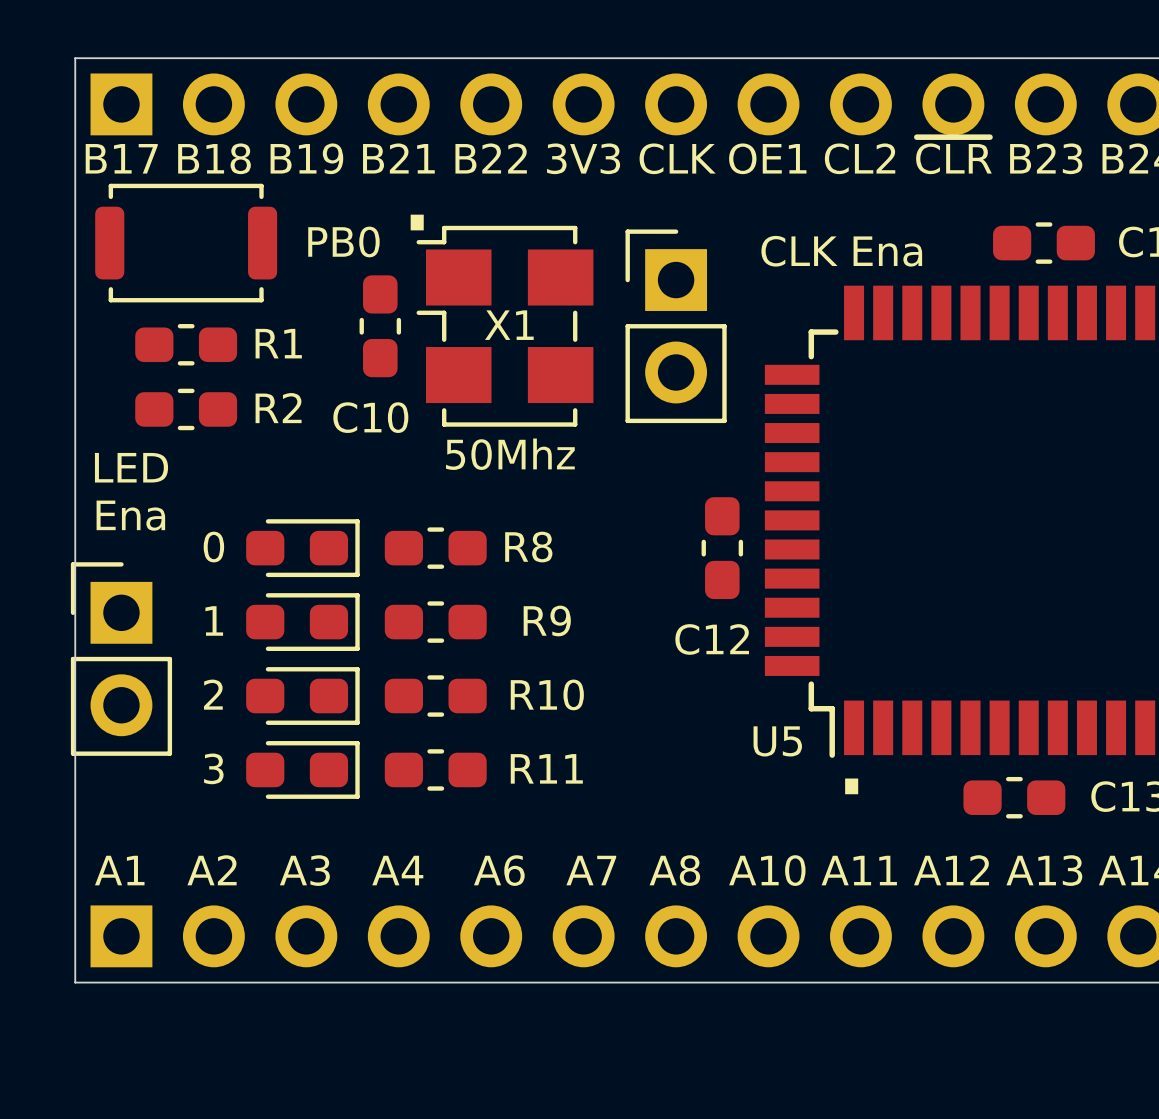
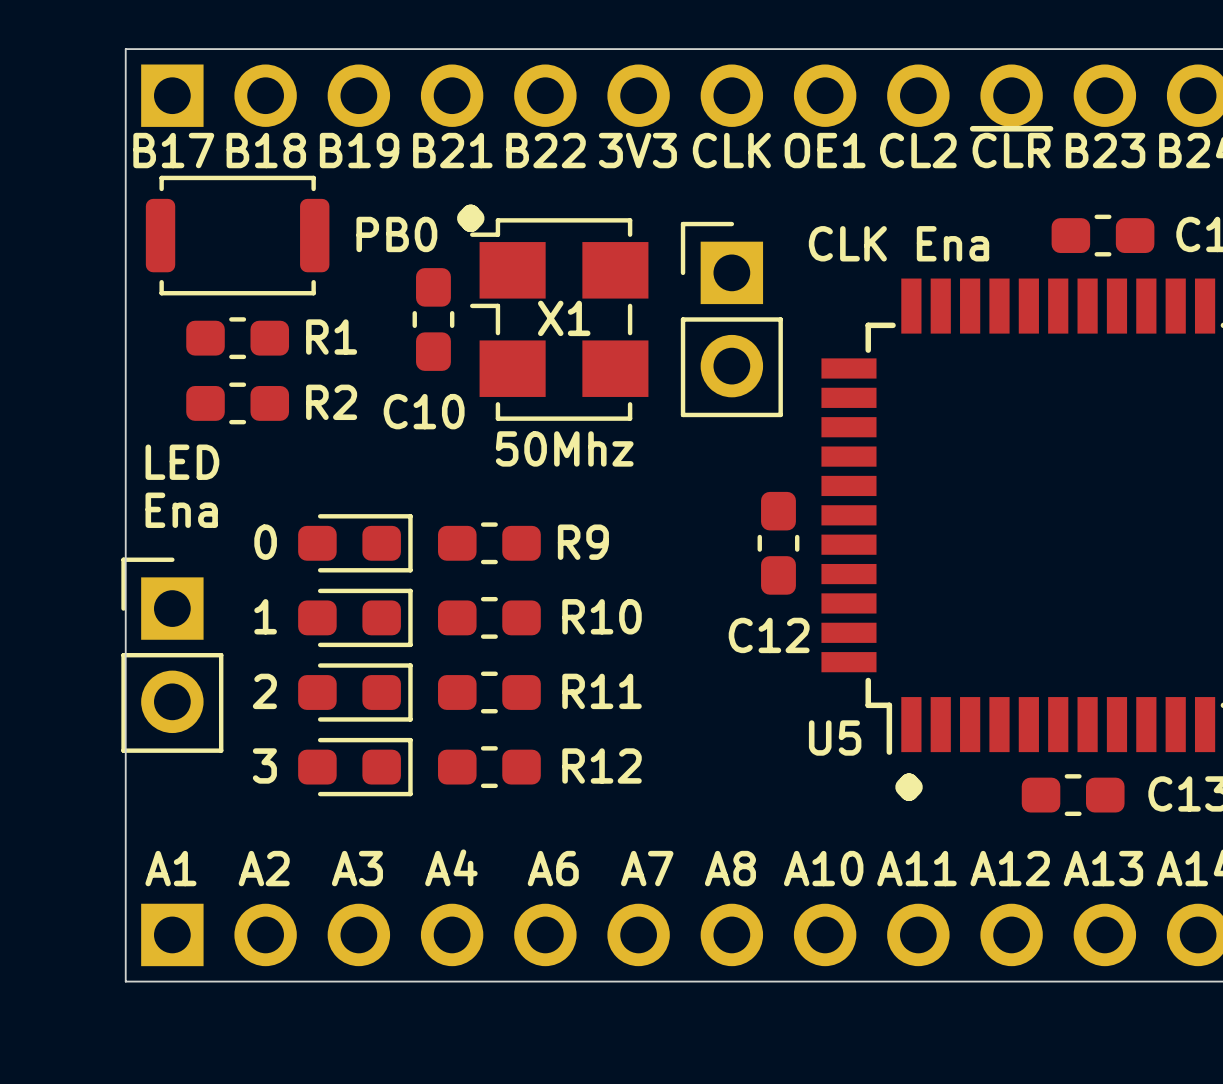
R8 name: R8 (528, 547) -> R9 (583, 542)
R9 name: R9 (547, 620) -> R10 (602, 616)
R10 name: R10 (547, 694) -> R11 (602, 691)
R11 name: R11 (546, 768) -> R12 (602, 765)

